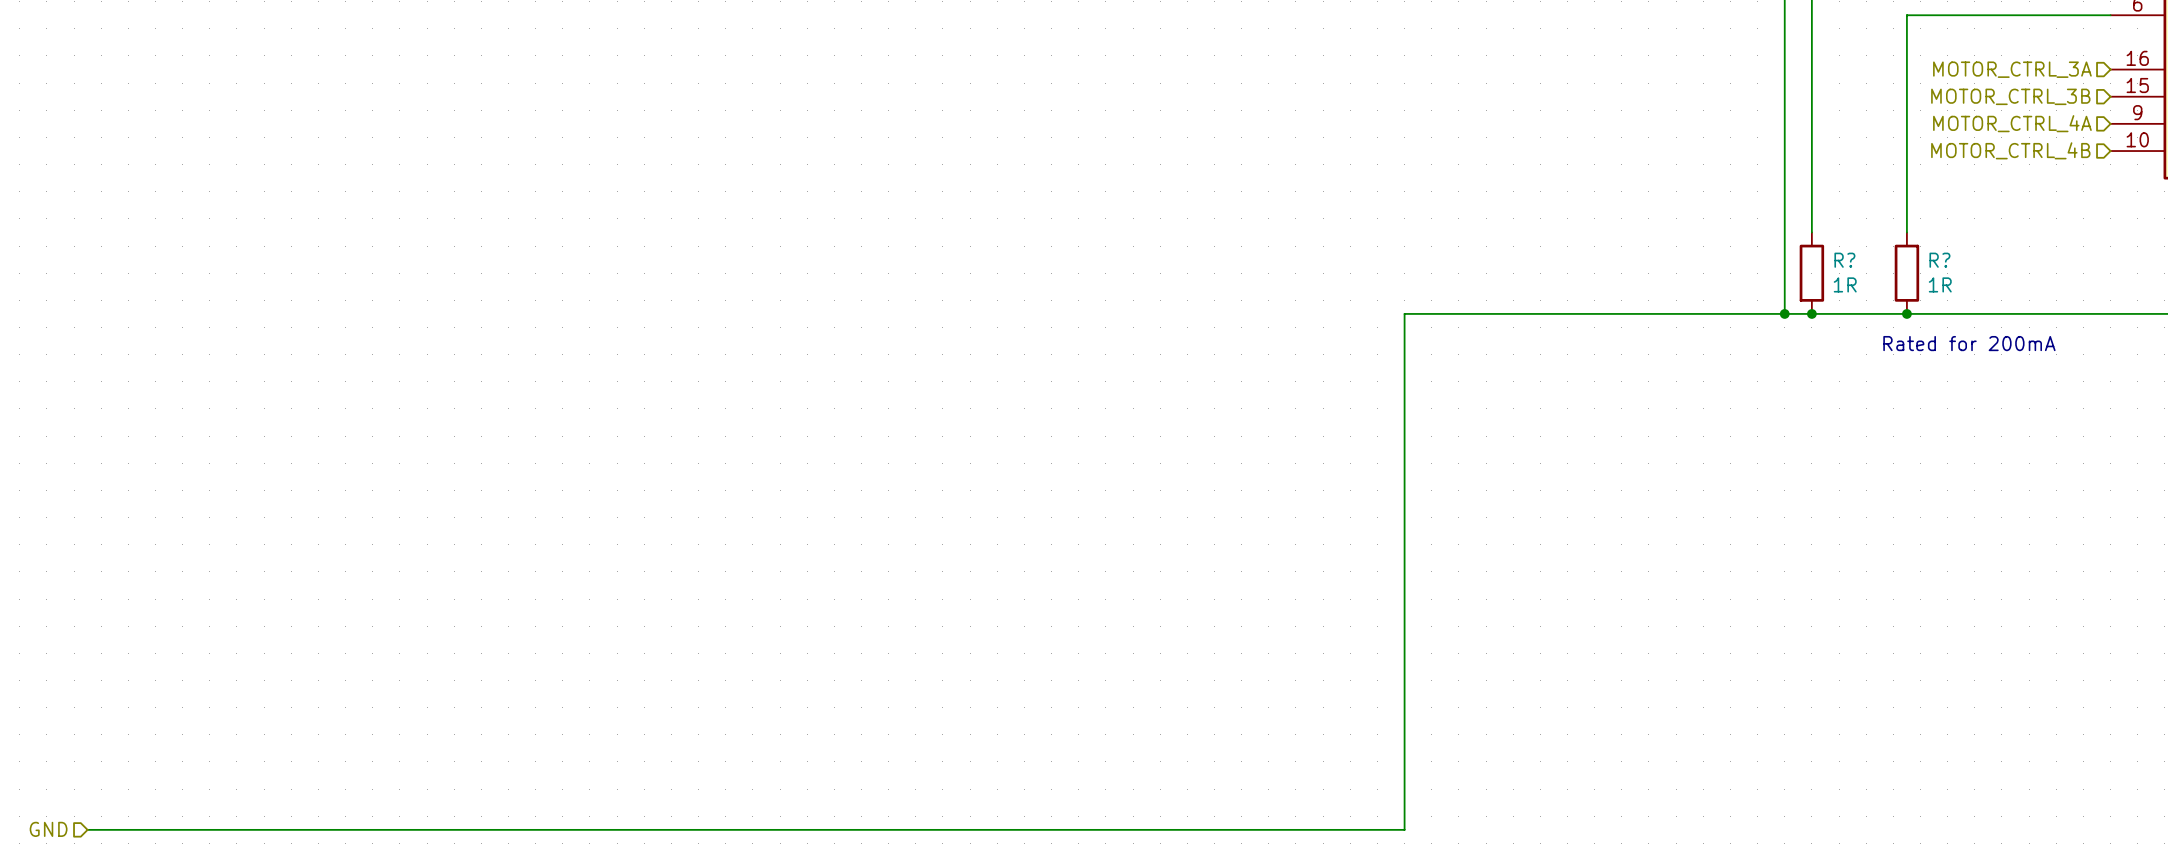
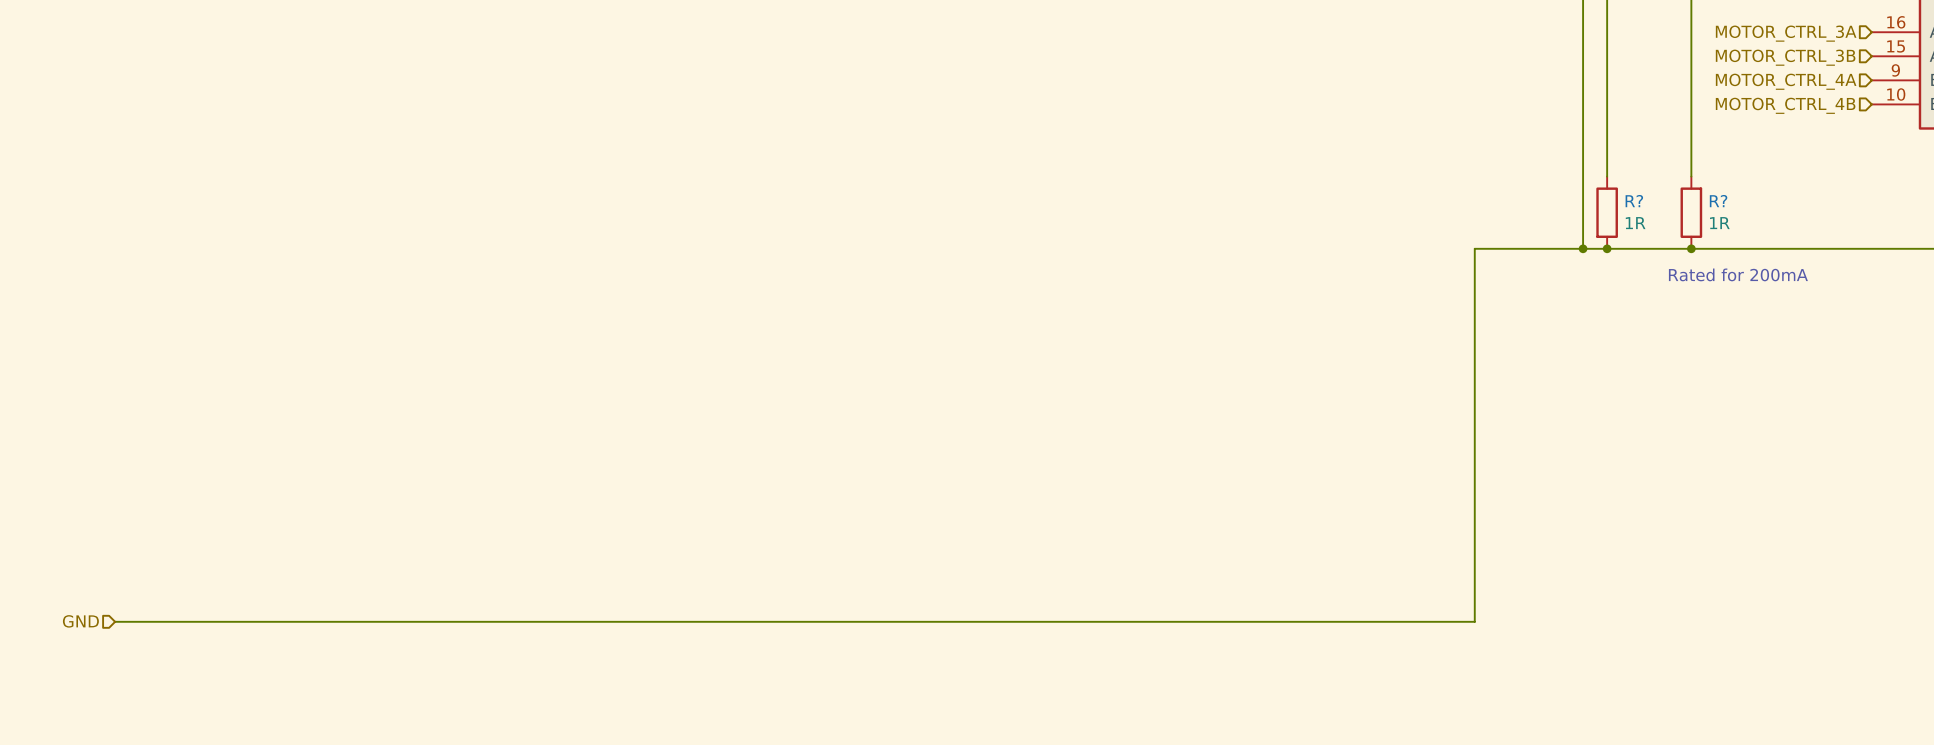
wire: (1662, 313) (1404, 313) (1404, 829) (87, 829) -> (1474, 248) (1474, 621) (115, 621)
hierarchical label position: GND (48, 829) -> GND (80, 621)

